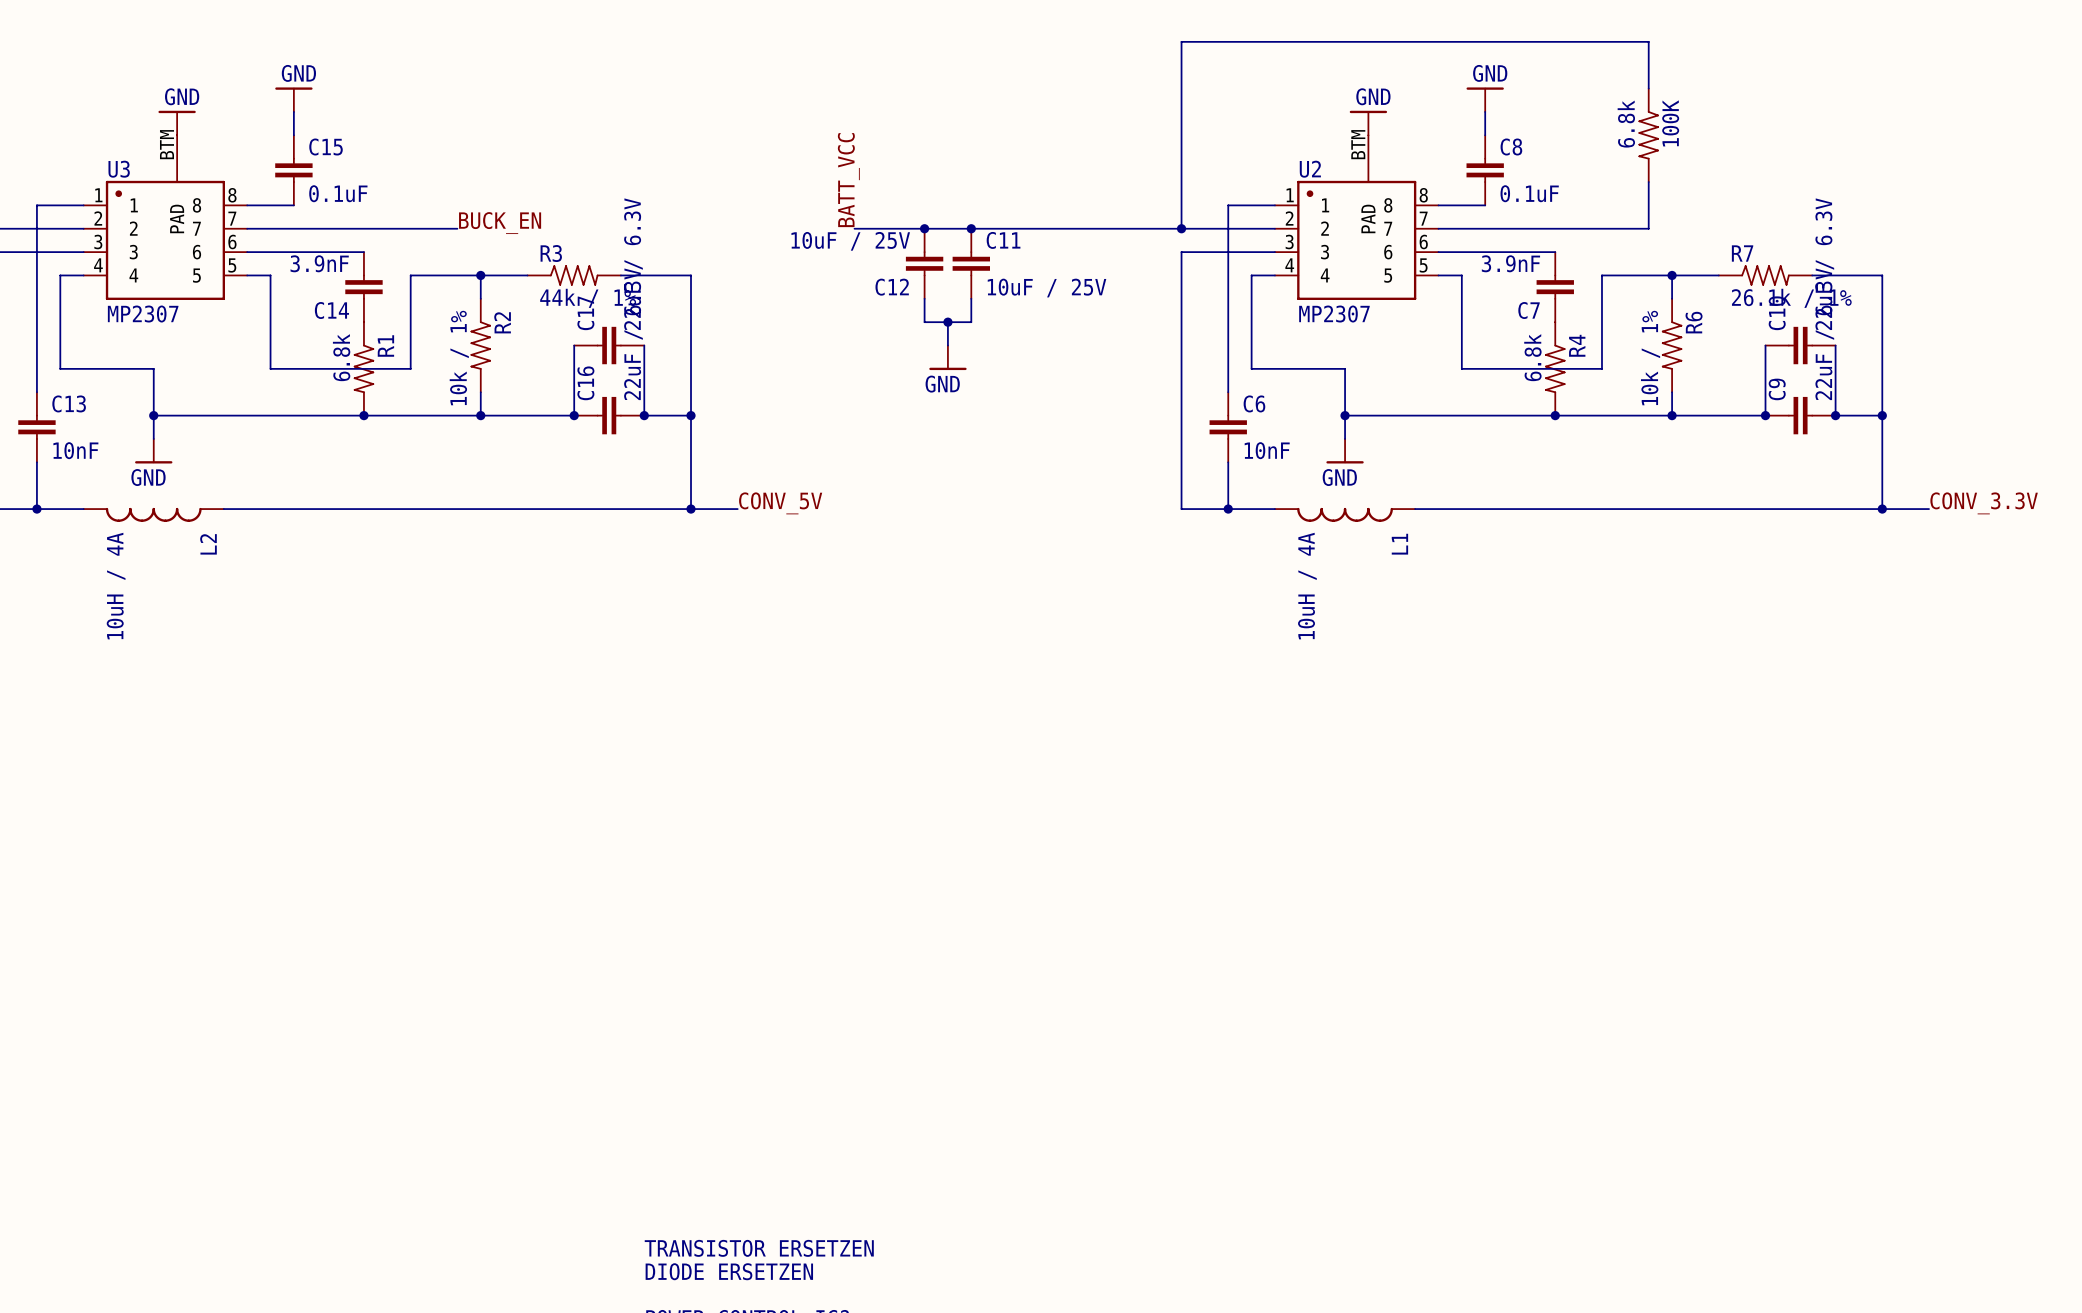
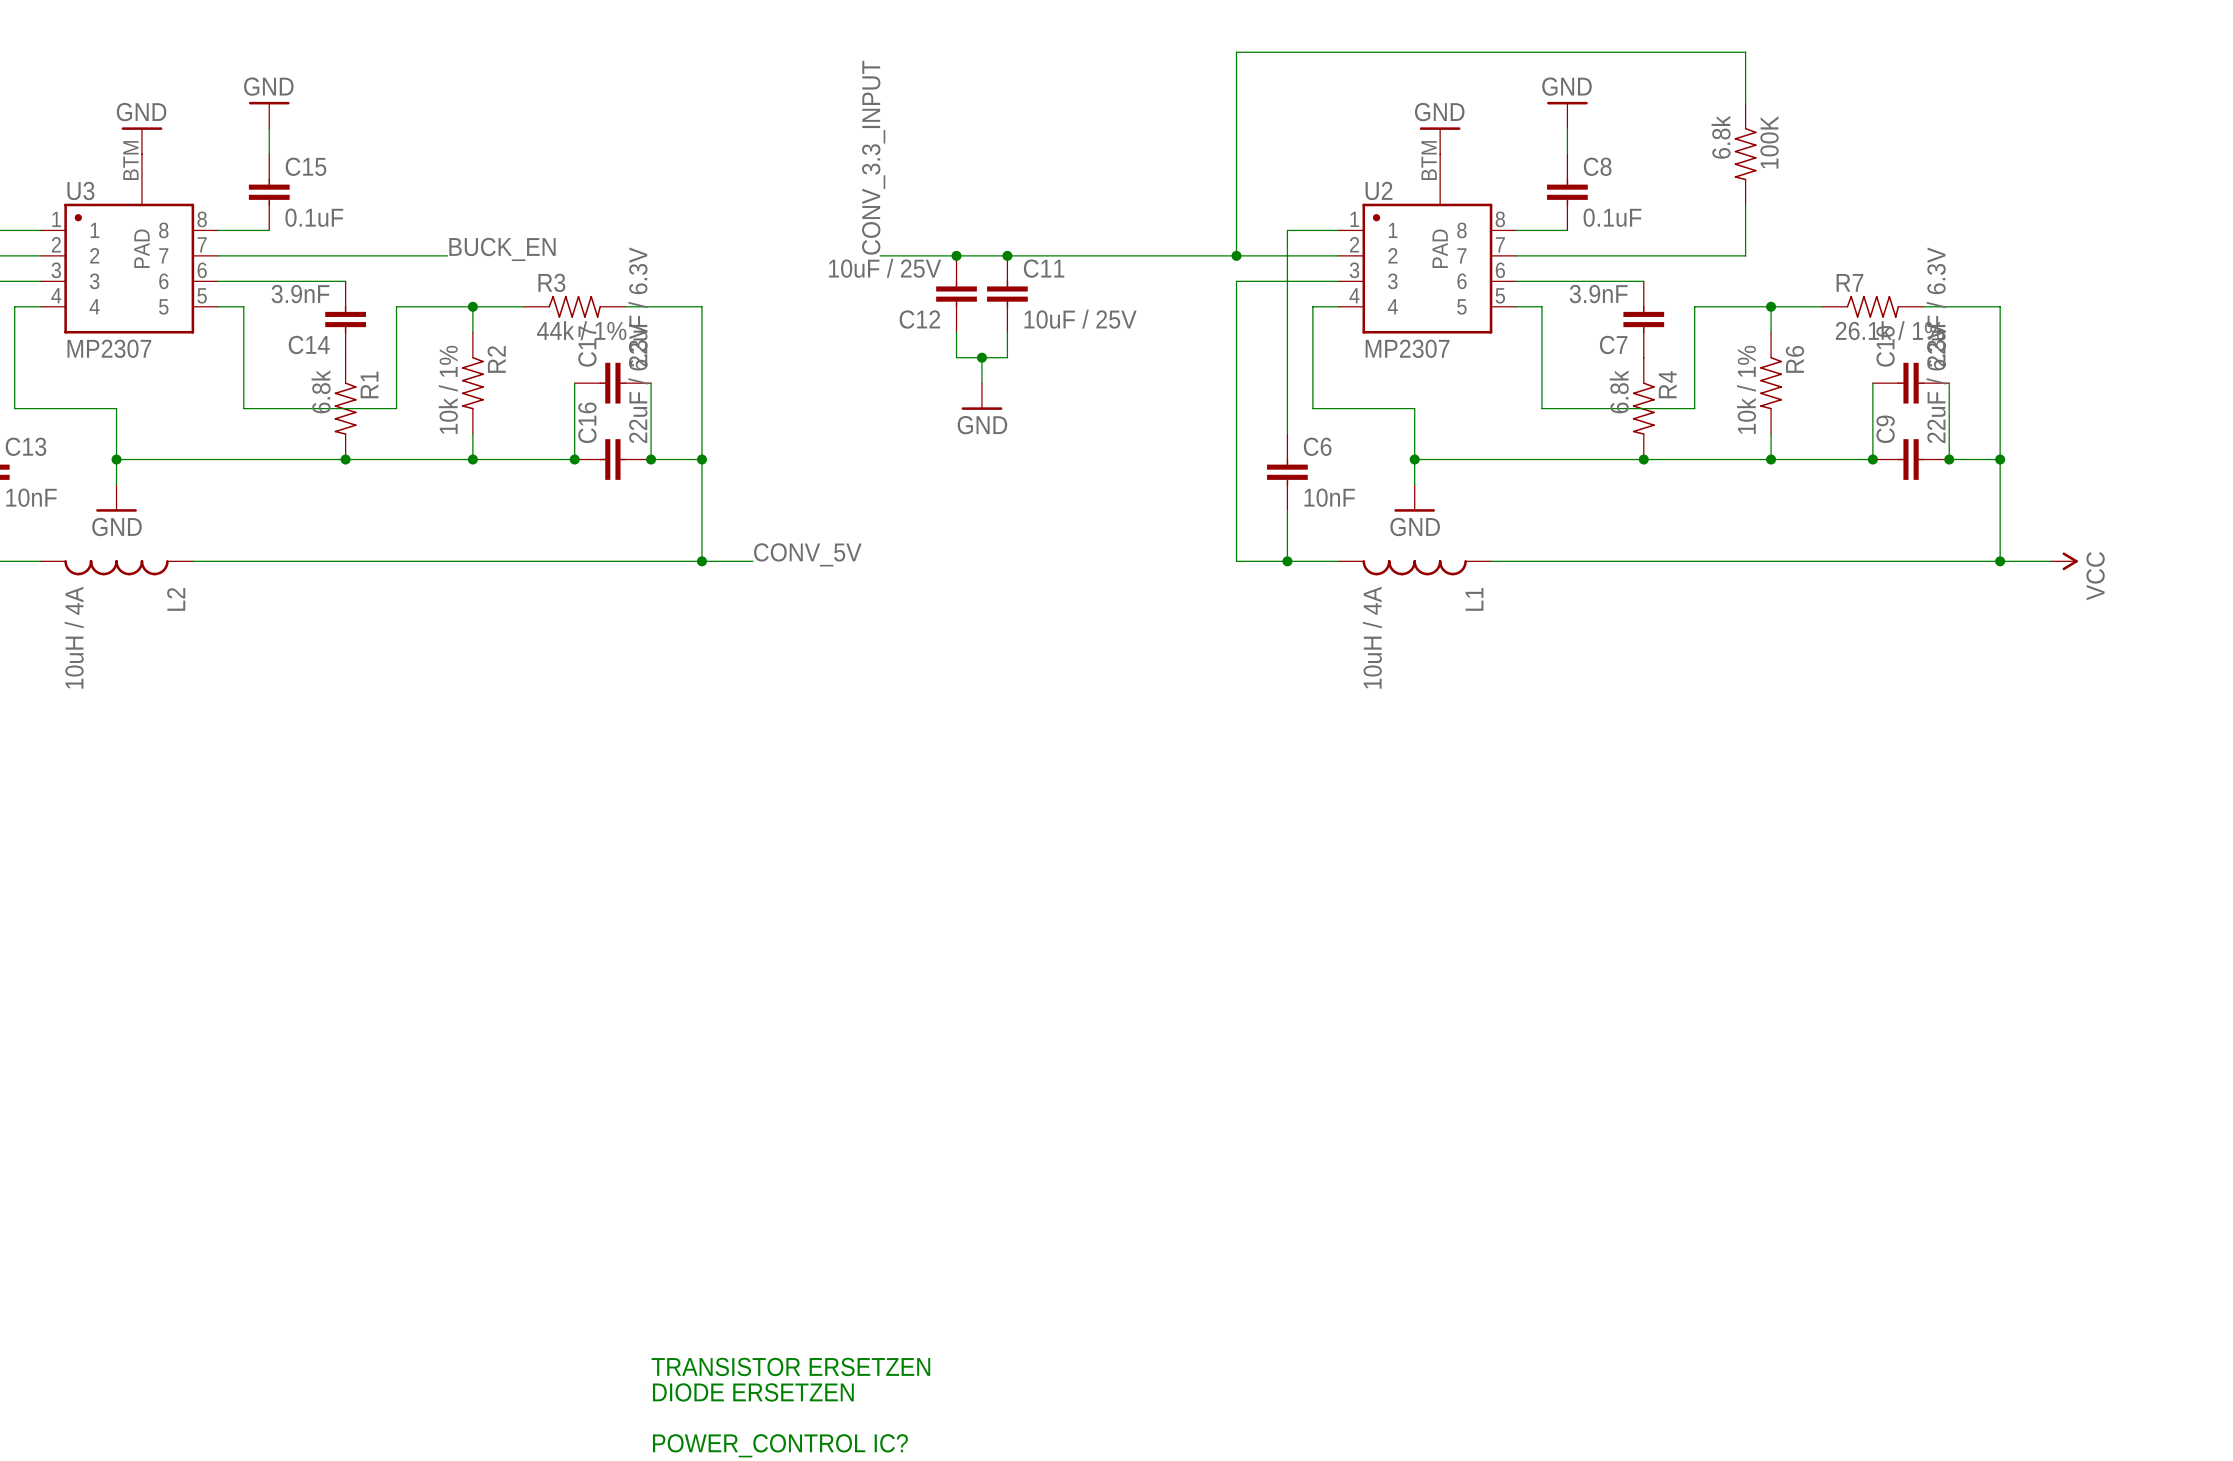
label: BATT_VCC (848, 180) -> CONV_3.3_INPUT (873, 157)
label: CONV_3.3V (1984, 503) -> none
power symbol: none -> VCC (2064, 561)

